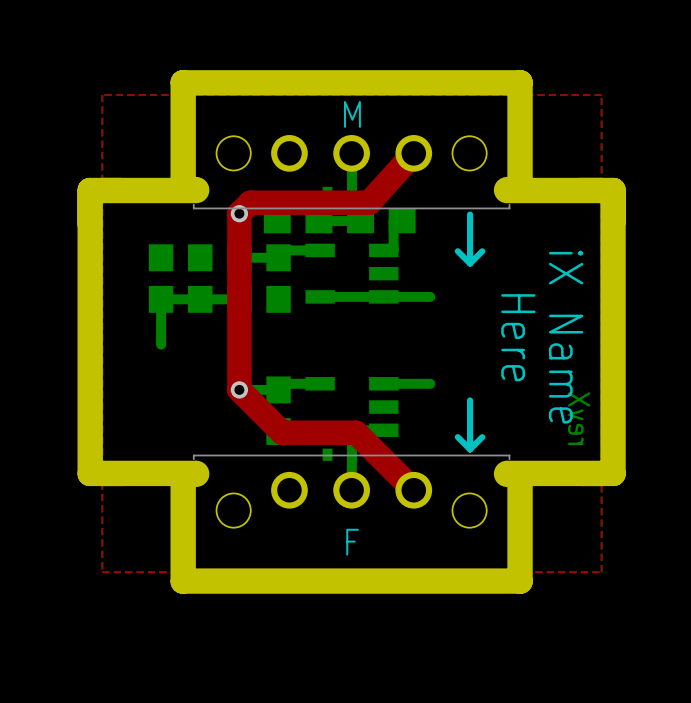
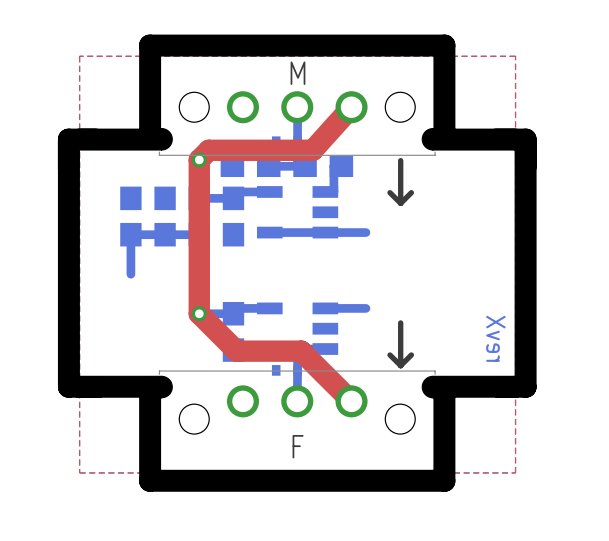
text: Here (518, 337) -> none
text: iX Name (566, 337) -> none

